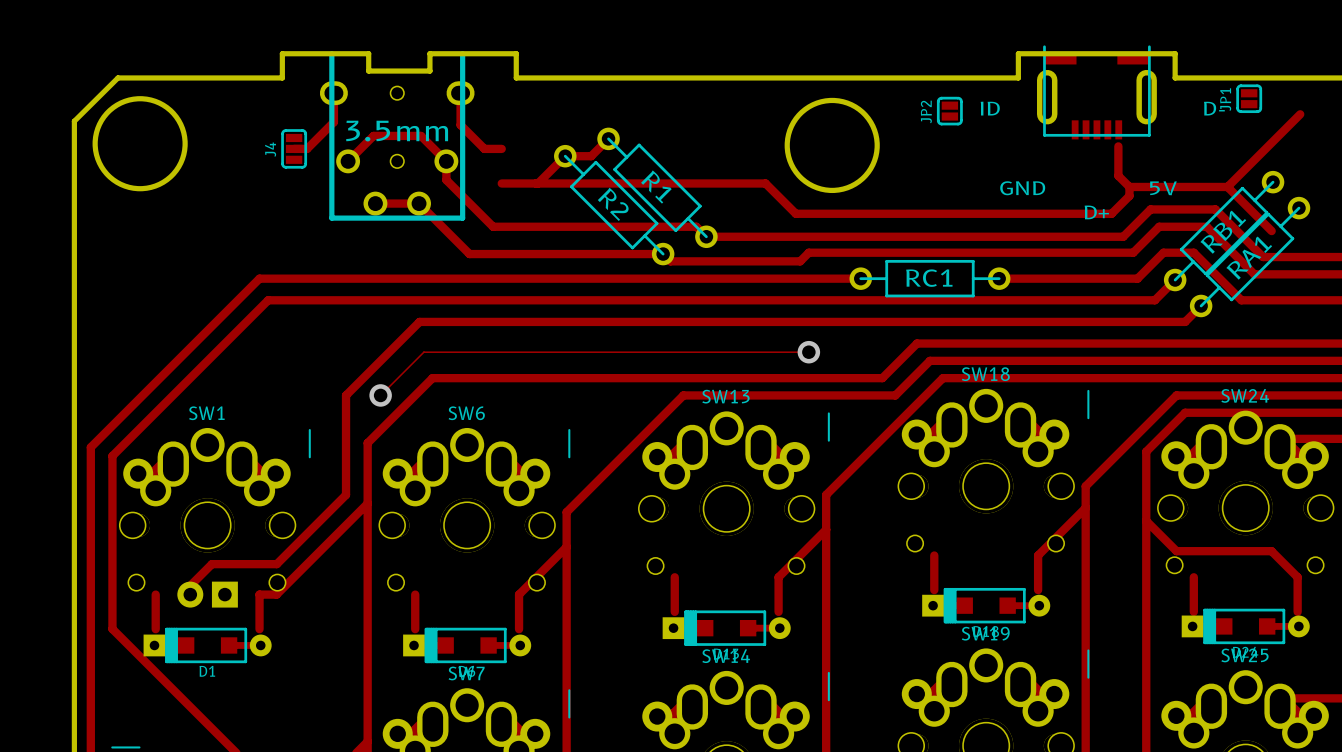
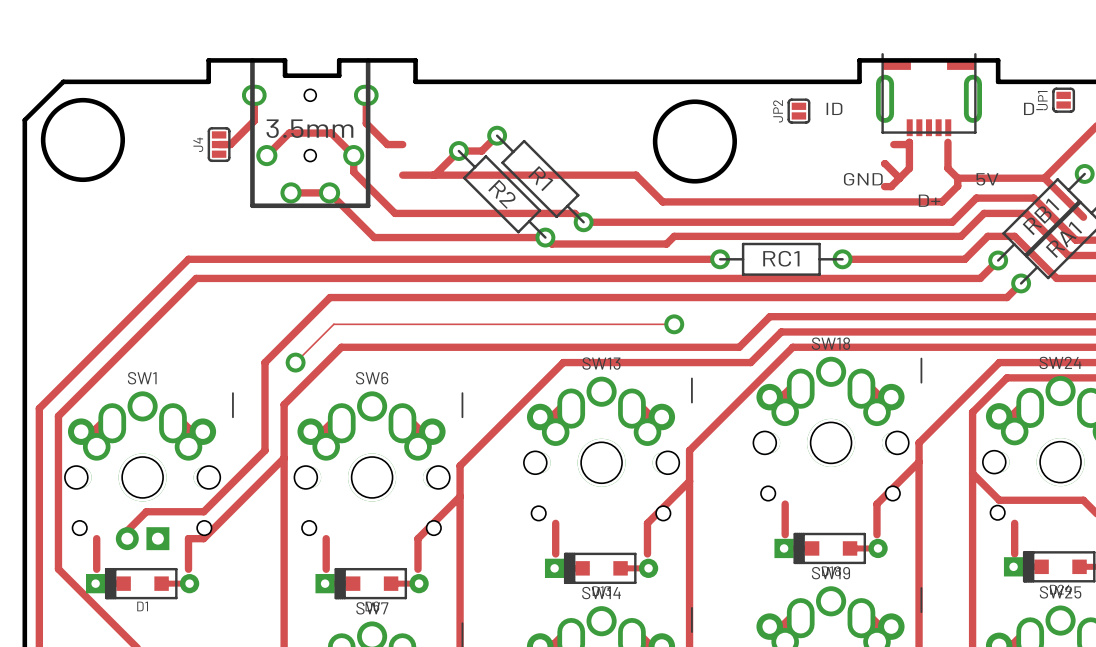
track: none -> (893, 144) (907, 144) (909, 142) (909, 168) (891, 186) (884, 186)
track: none -> (884, 163) (899, 178)

